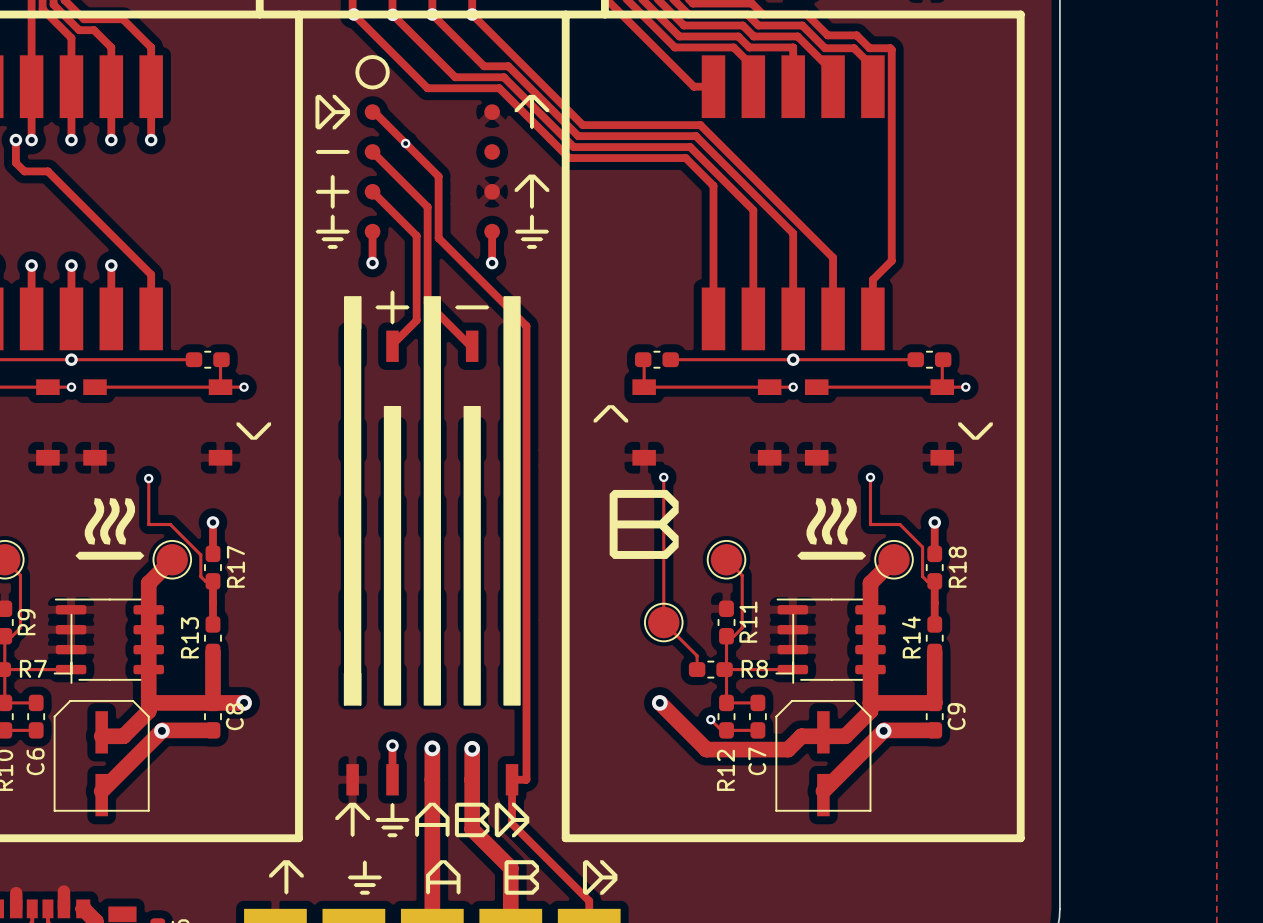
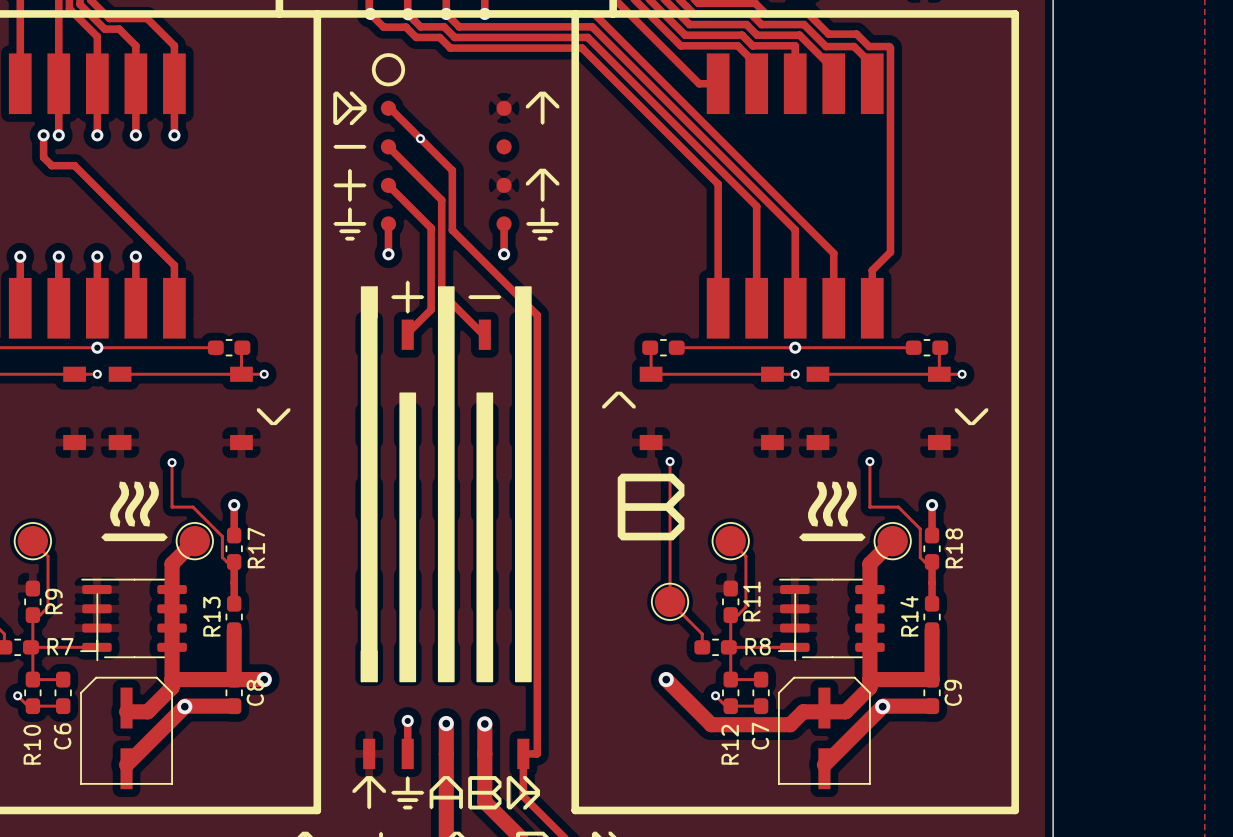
track: (472, 14) (582, 125) (700, 125) (833, 257) (833, 262) -> (484, 13) (594, 13) (833, 253)
track: (405, 27) (455, 77) (503, 77) (573, 147) (690, 147) (753, 210) (753, 213) -> (420, 26) (444, 26) (454, 37) (587, 37) (756, 206)
track: (445, 27) (484, 66) (508, 66) (578, 136) (695, 136) (793, 233) (793, 237) -> (459, 26) (592, 26) (795, 229)
track: (367, 28) (427, 88) (499, 88) (569, 158) (685, 158) (713, 185) (713, 190) -> (383, 27) (405, 27) (416, 37) (439, 37) (450, 48) (582, 48) (718, 184)

